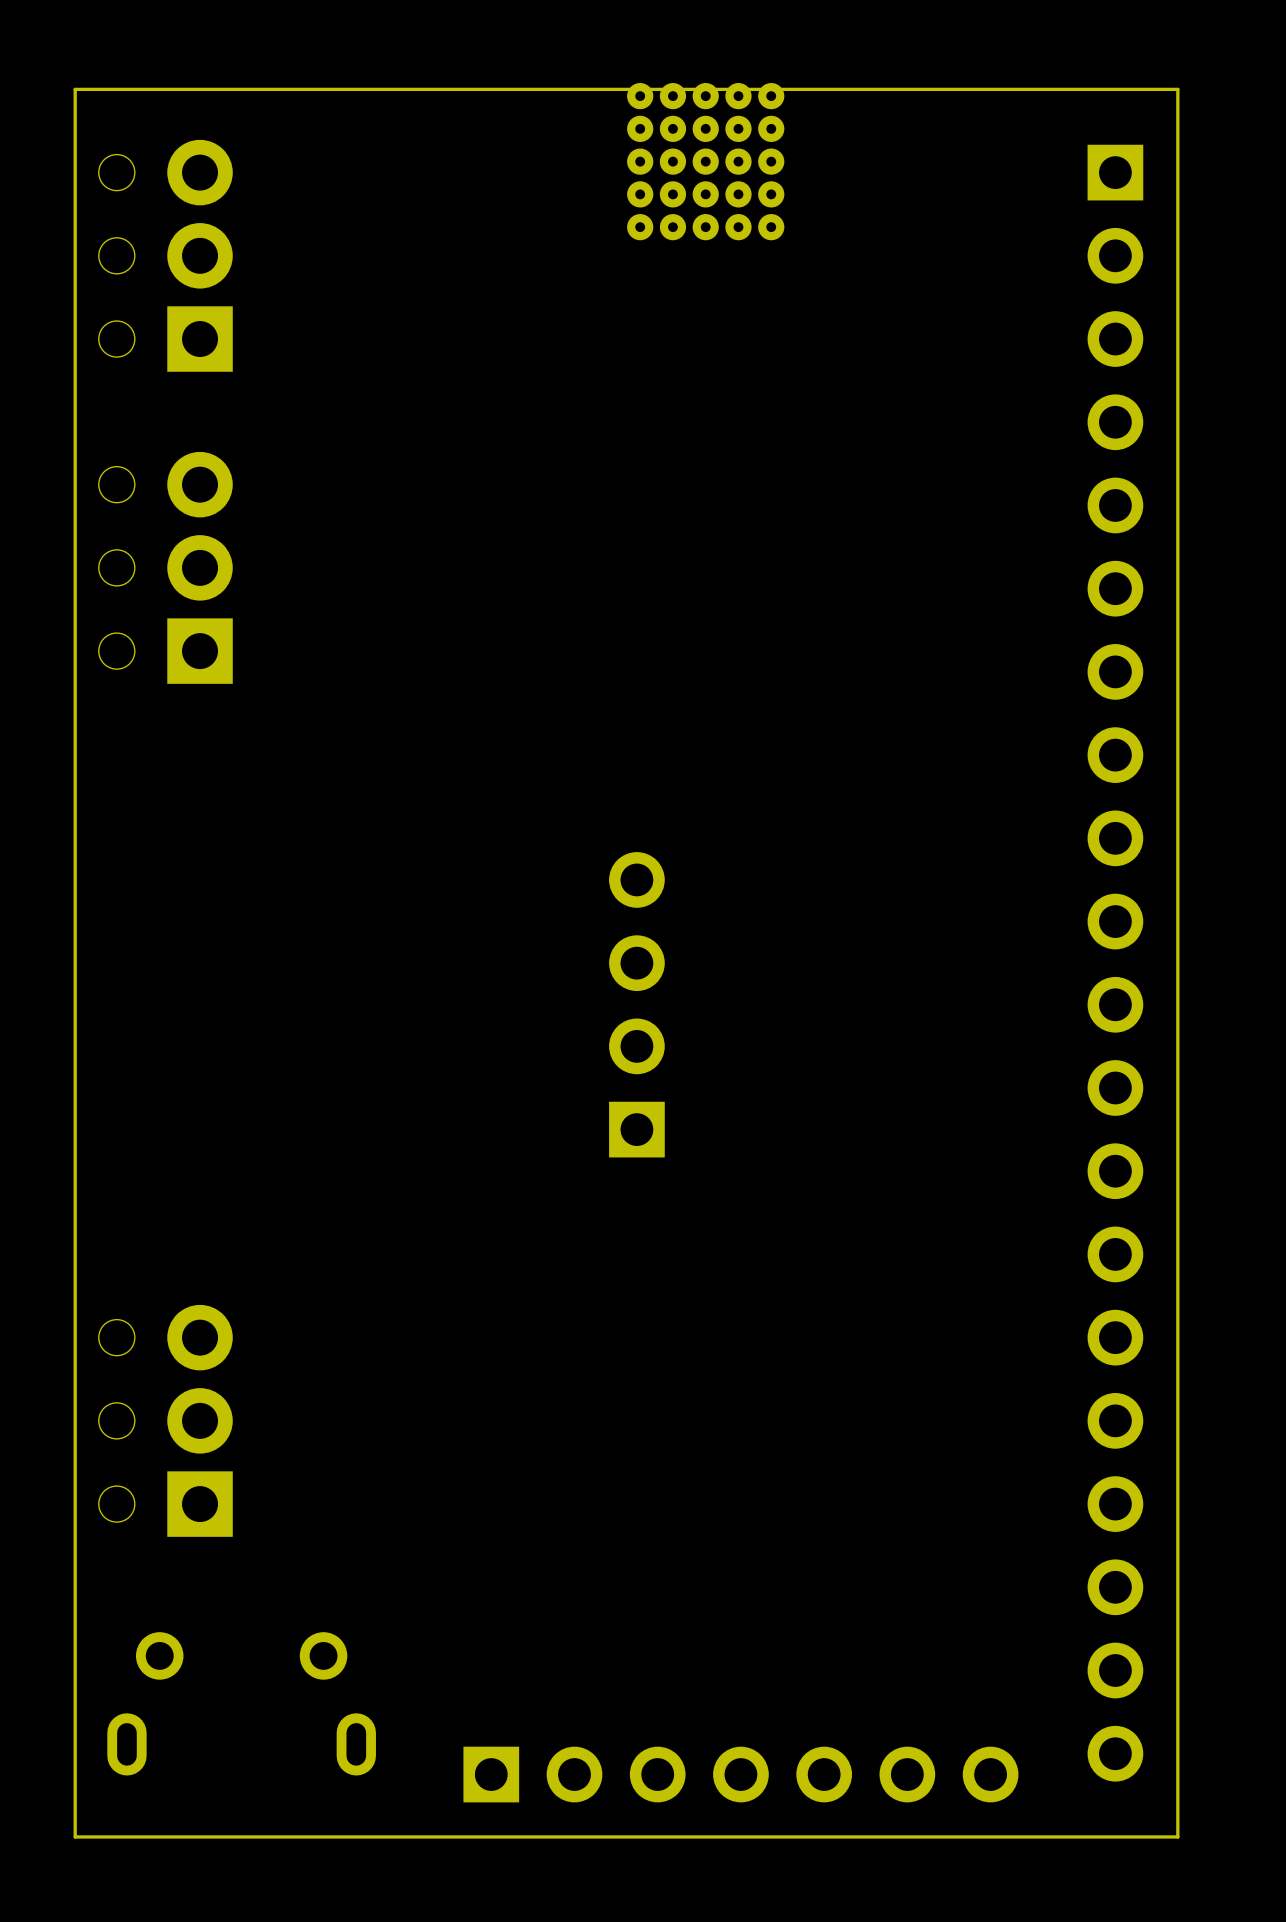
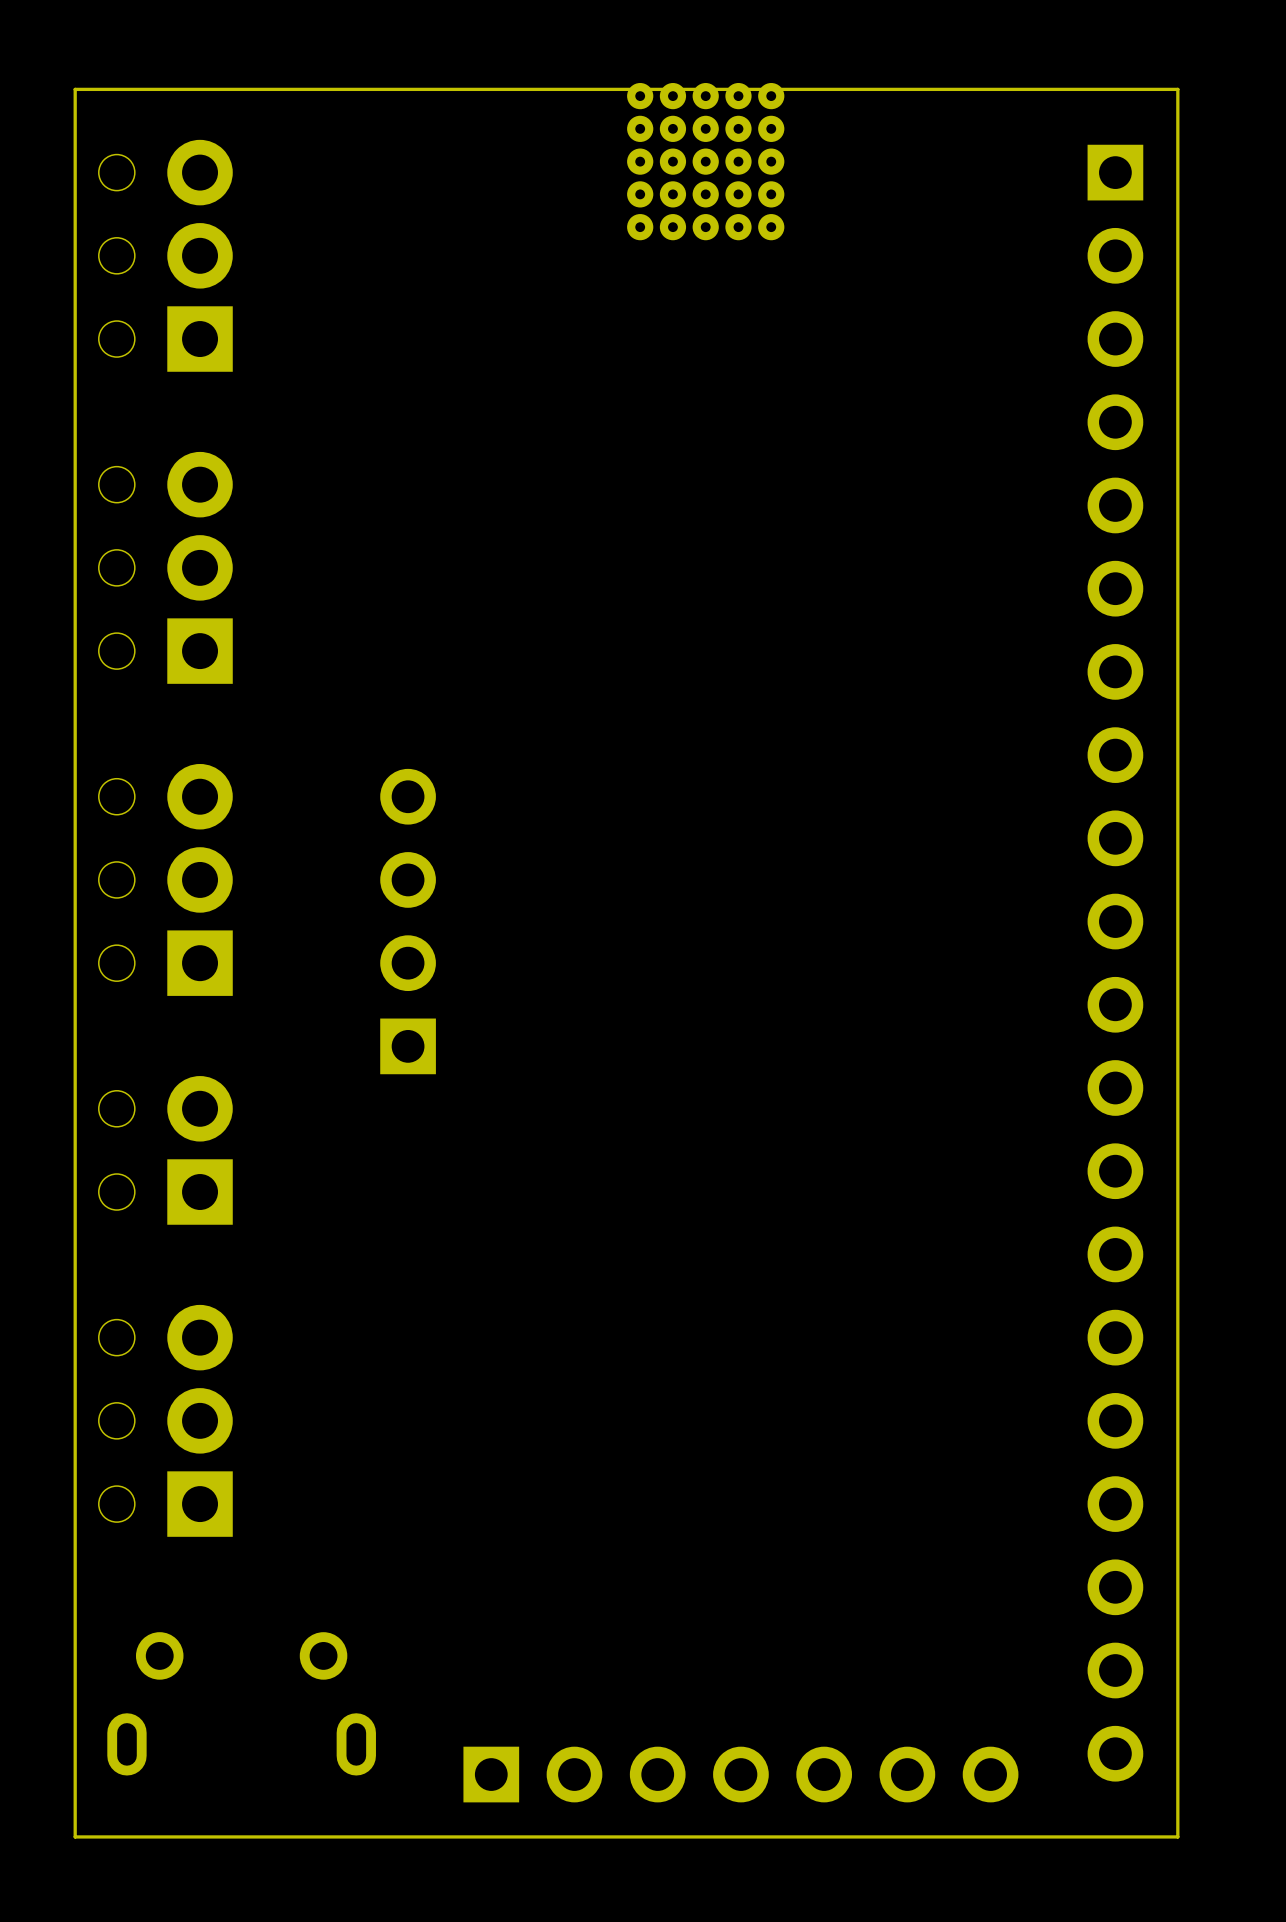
part: none -> (165, 879)
part position: (636, 1004) -> (408, 921)
part: none -> (165, 1150)

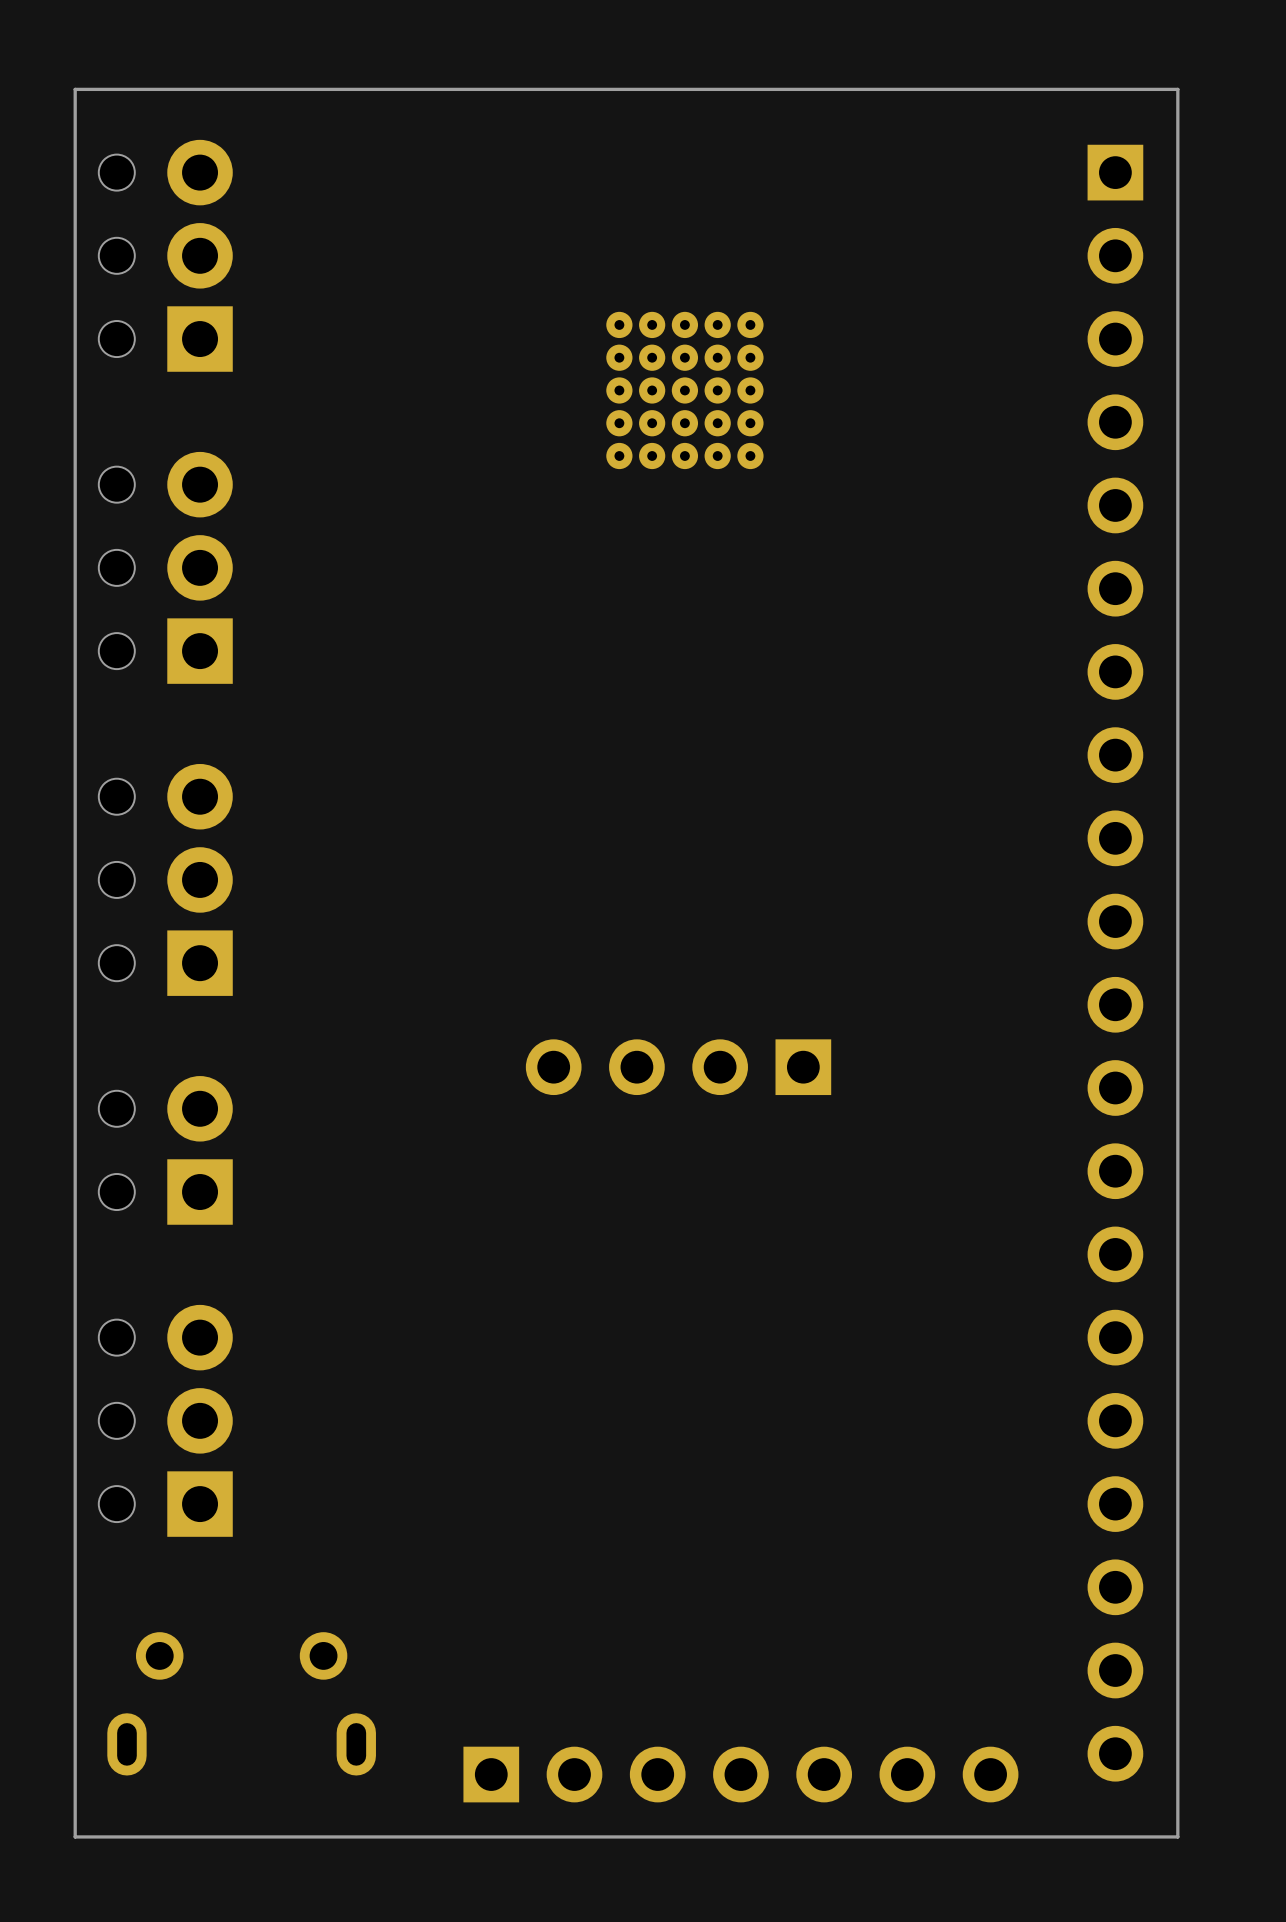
part position: (705, 161) -> (684, 390)
part rotation: 0° (408, 921) -> 90° counterclockwise (678, 1067)
part position: (408, 921) -> (678, 1067)

